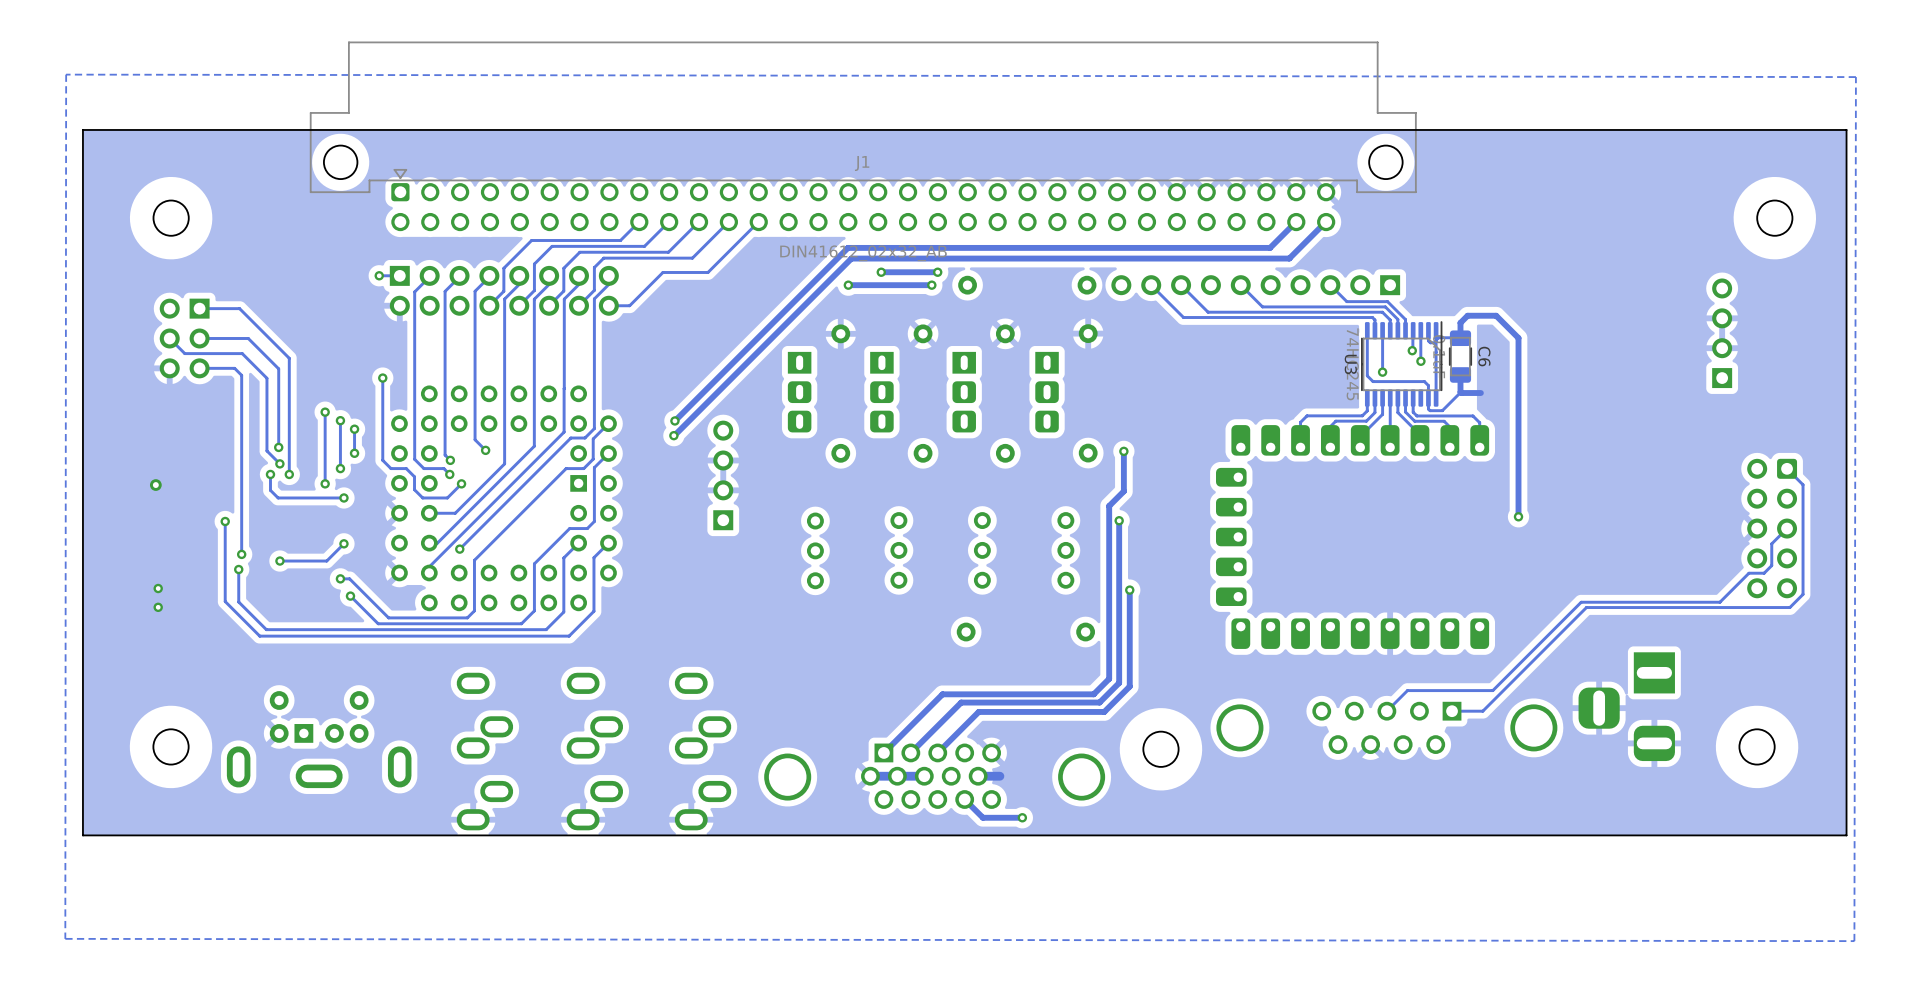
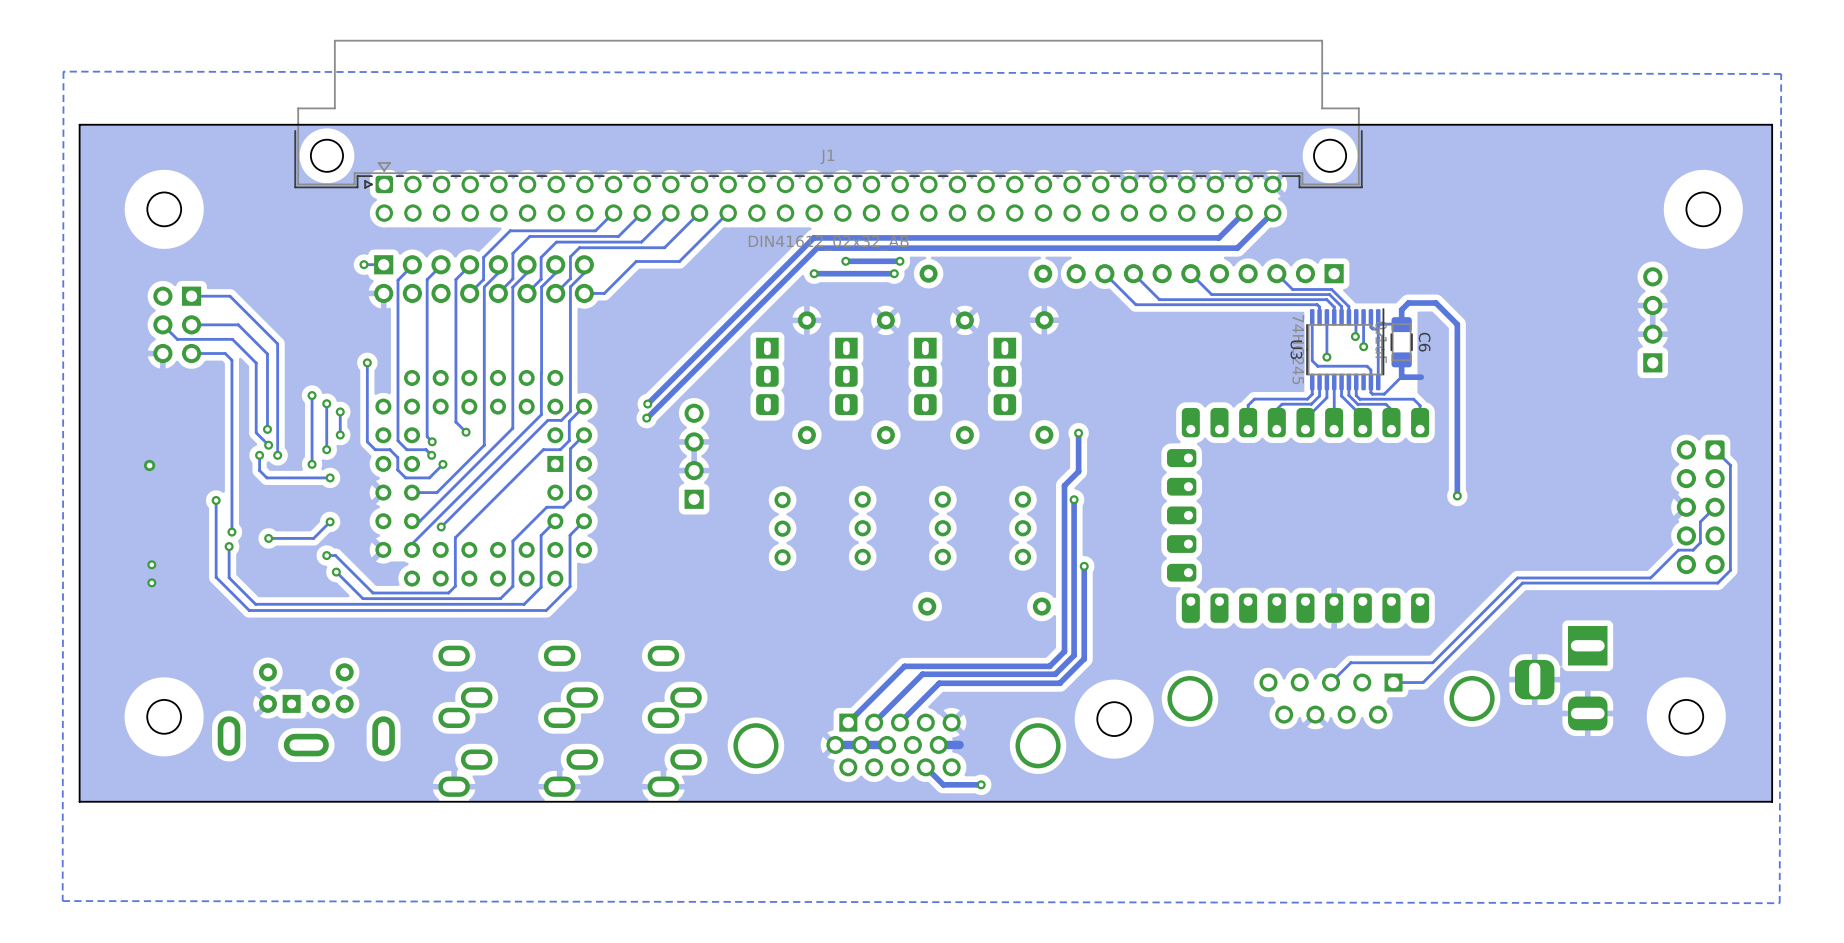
J1 footprint: [310, 41, 1417, 232] -> [294, 40, 1363, 222]

